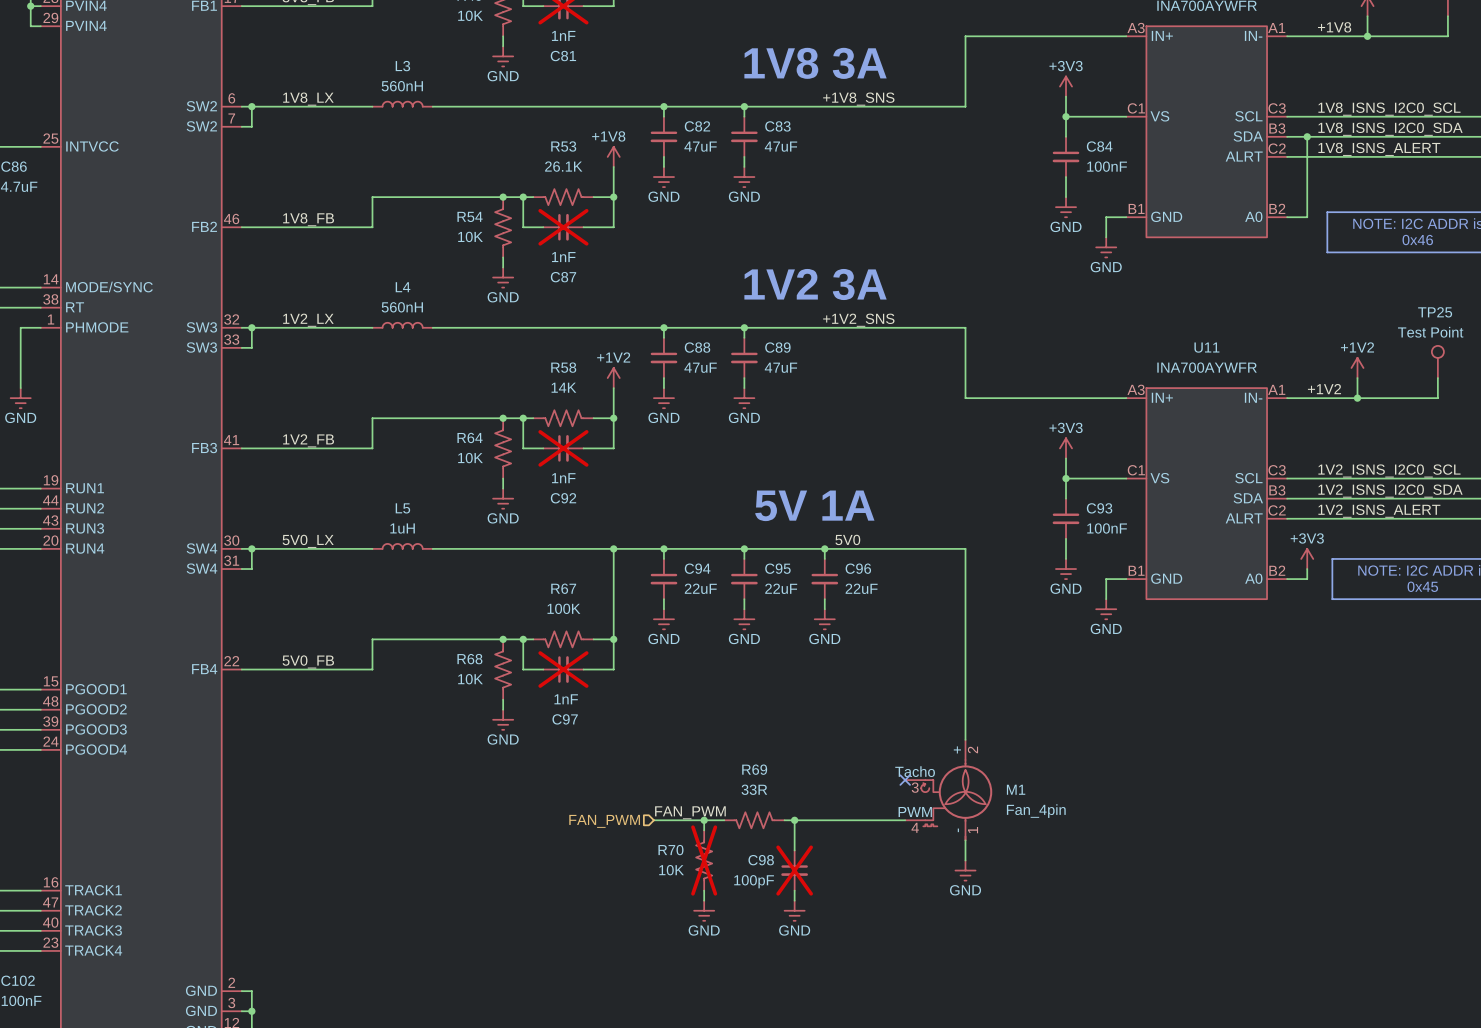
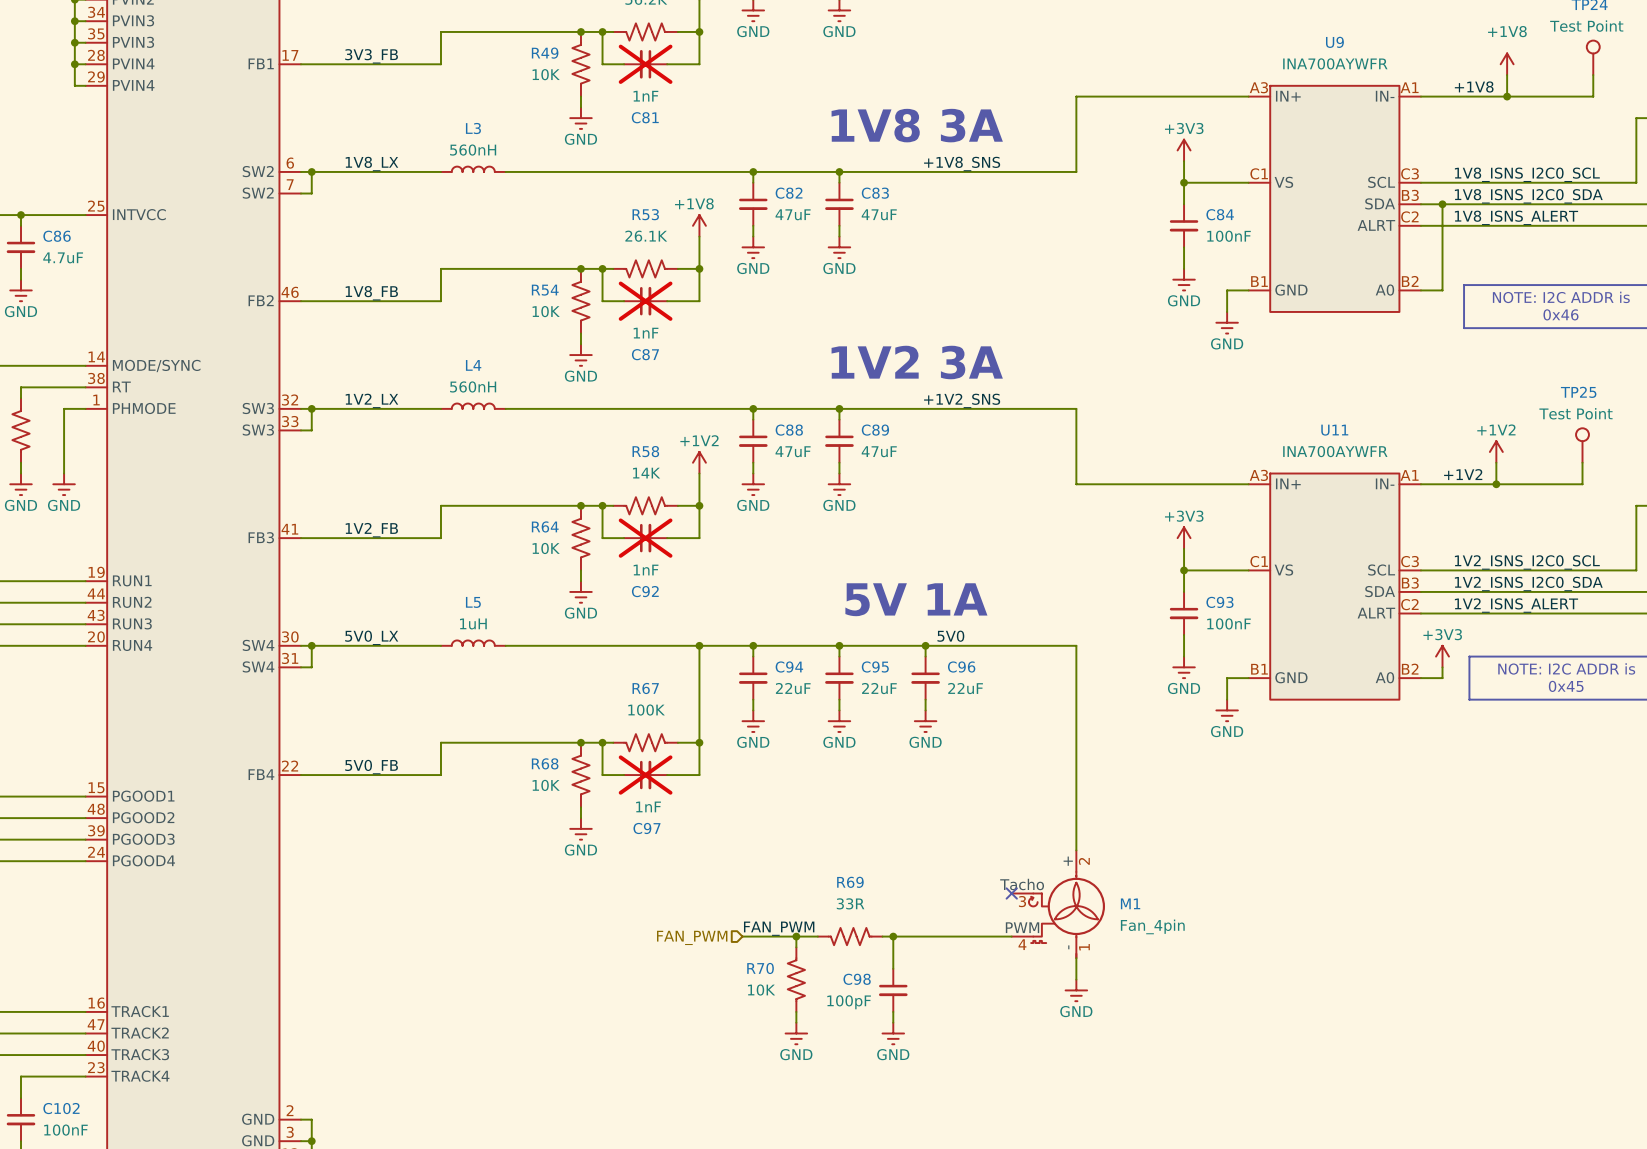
R70 do-not-place cross: (704, 860) -> none
C98 do-not-place cross: (794, 870) -> none

